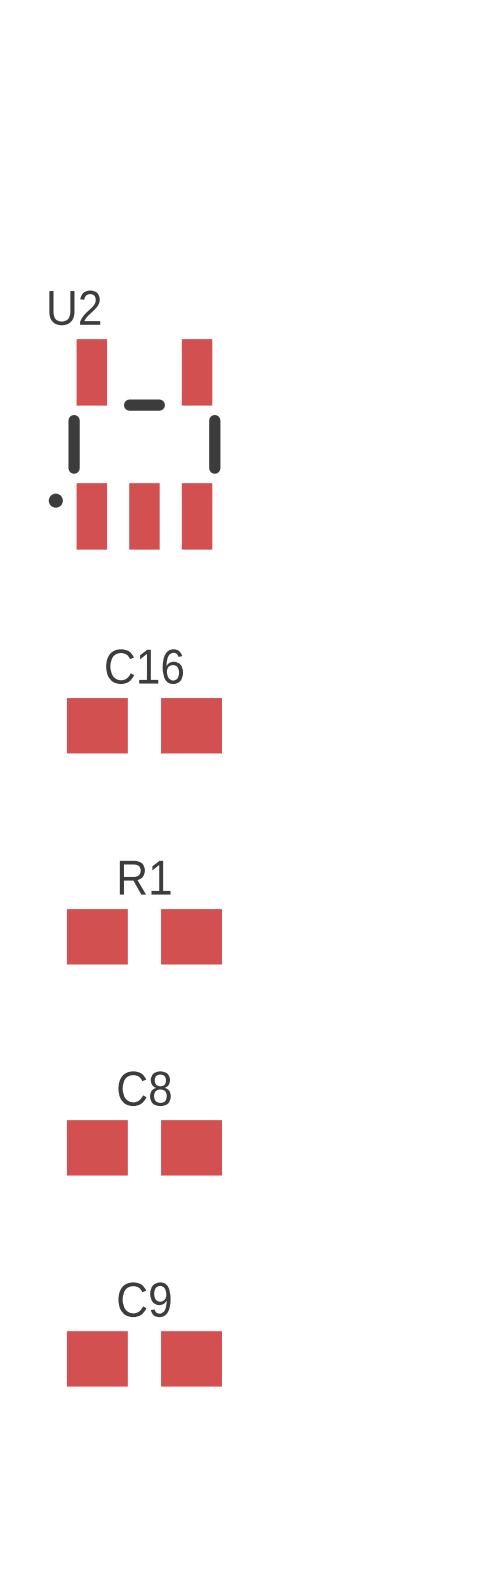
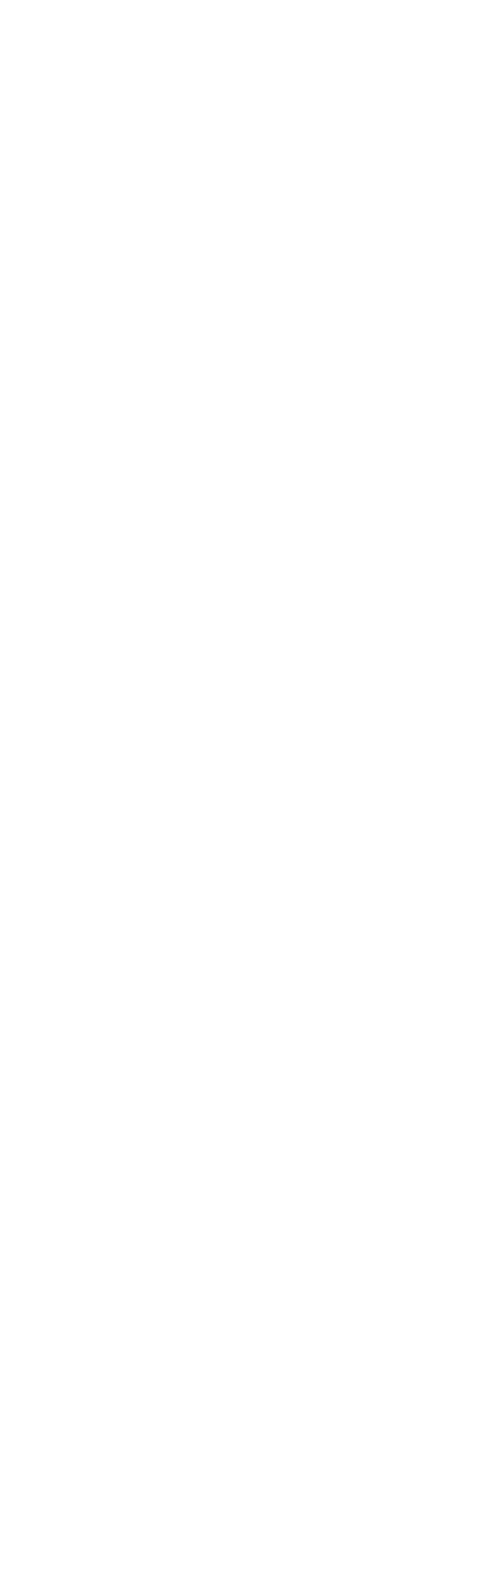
U2: (134, 444) -> none
C16: (144, 725) -> none
R1: (144, 936) -> none
C8: (144, 1147) -> none
C9: (144, 1358) -> none

